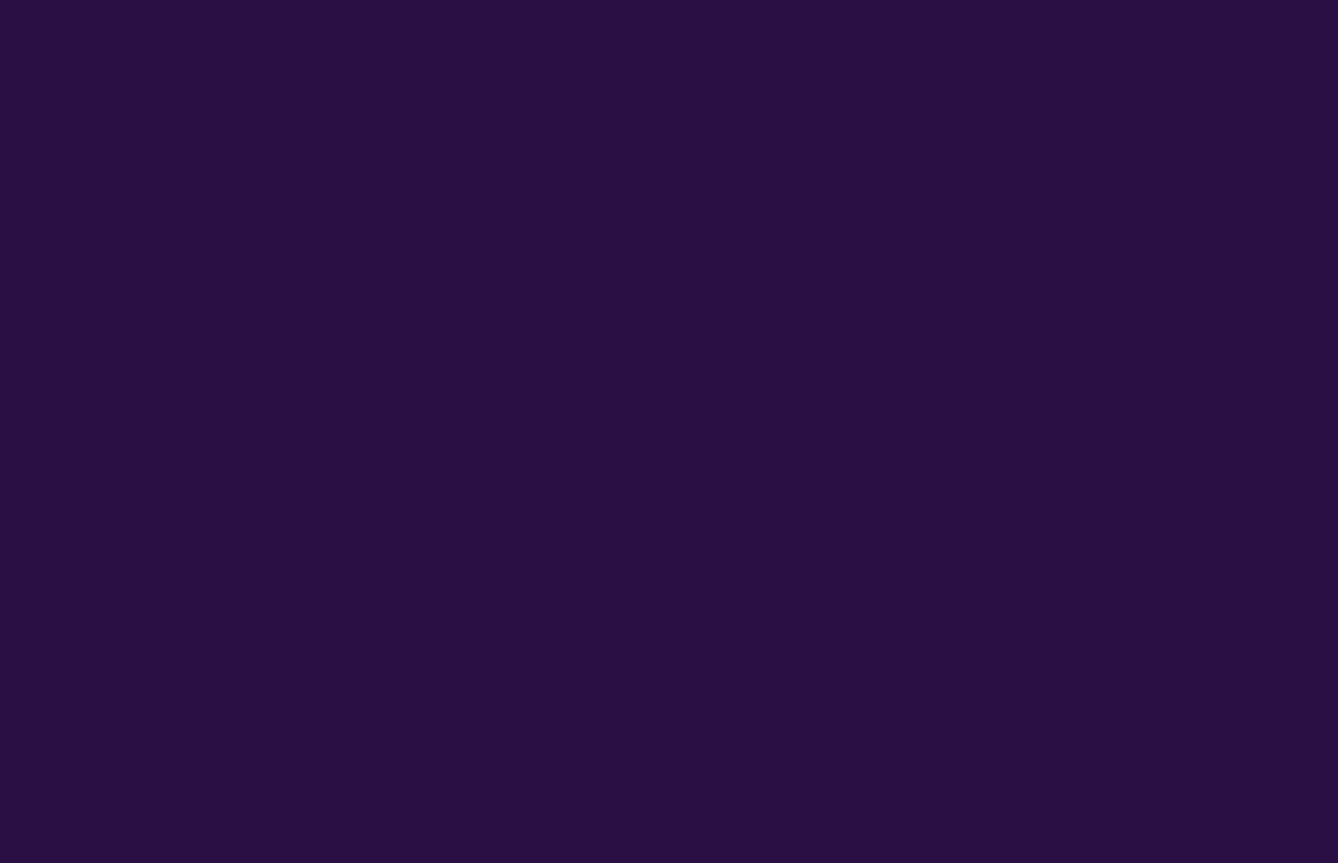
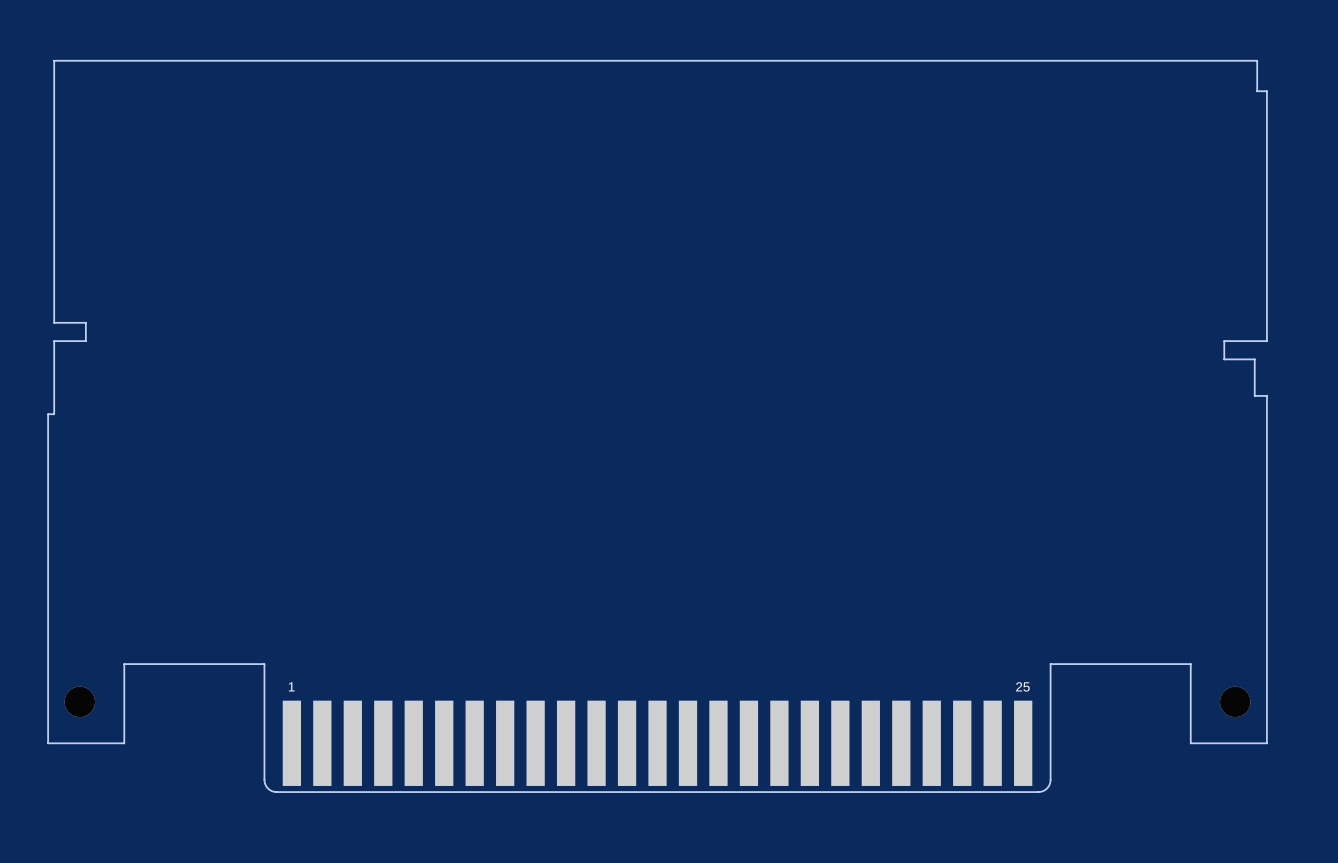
board edge: none -> (1257, 60) (1257, 91) (1266, 91) (1266, 341) (1224, 341) (1224, 359) (1254, 359) (1254, 395) (1266, 395) (1266, 743) (1190, 743) (1190, 664) (1050, 664) (1050, 781) (1047, 788) (1040, 791) (275, 791) (268, 788) (264, 781) (264, 664) (124, 664) (124, 743) (48, 743) (48, 414) (54, 414) (54, 341) (85, 341) (85, 322) (54, 322) (54, 60) (1257, 60)
text: none -> 1 (291, 686)
text: none -> 25 (1022, 686)
part: none -> (79, 701)
part: none -> (1235, 701)
part: none -> (657, 743)

